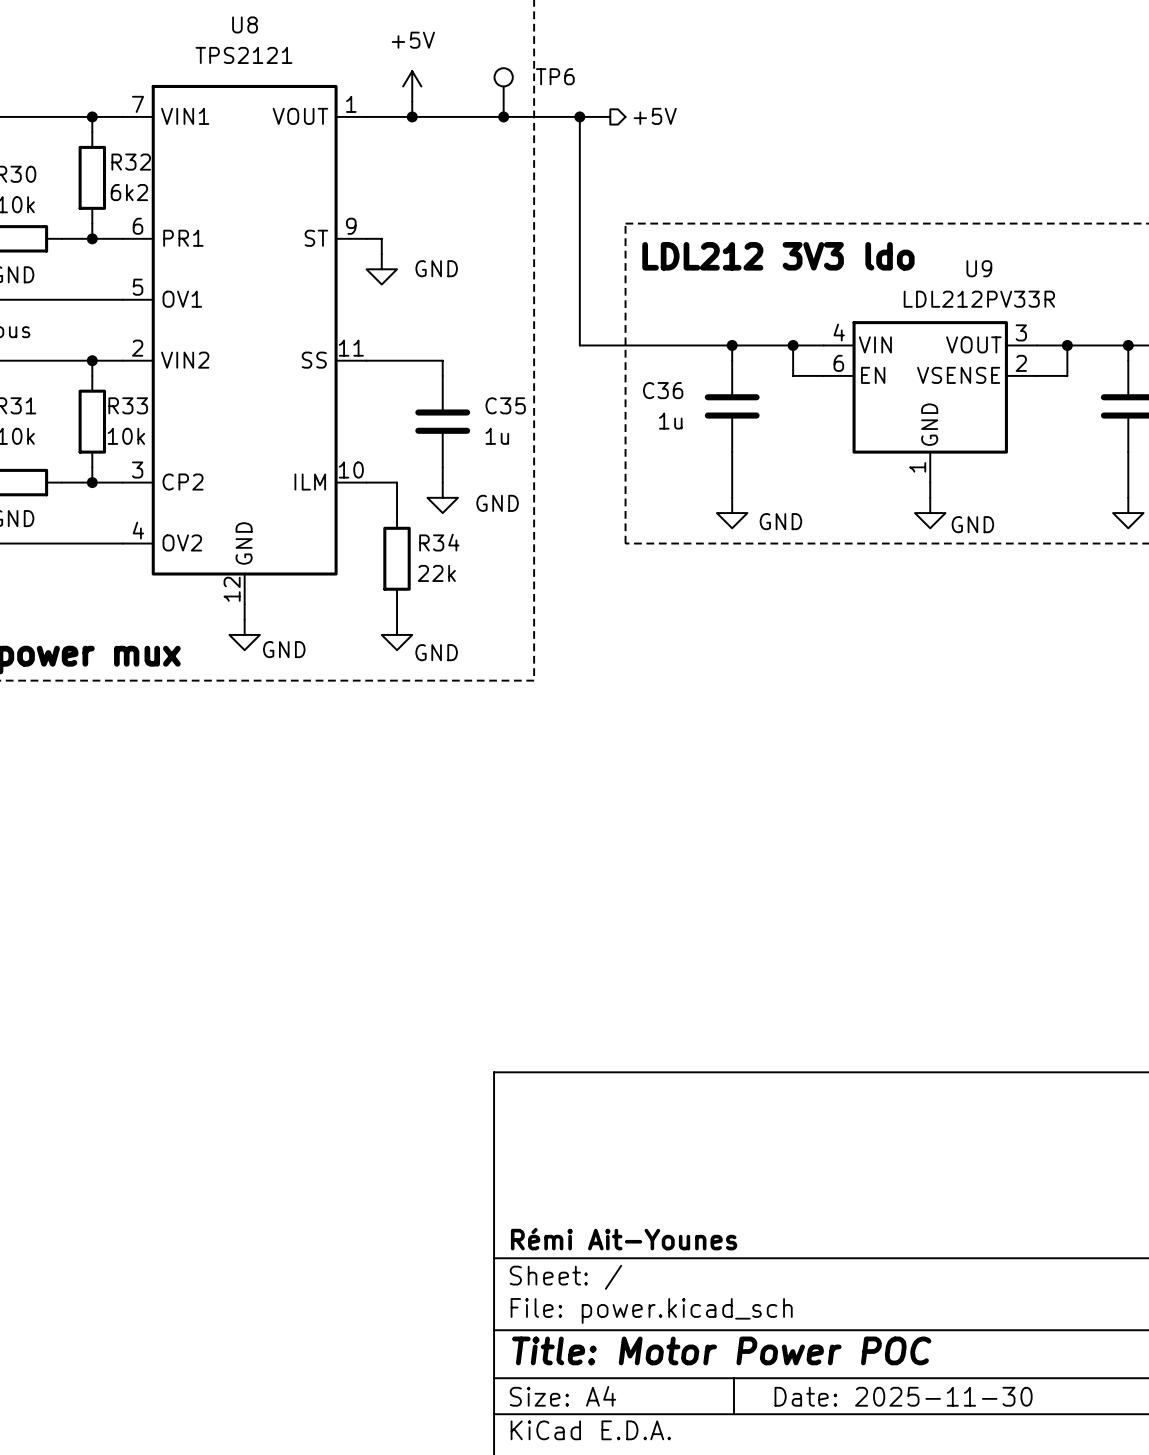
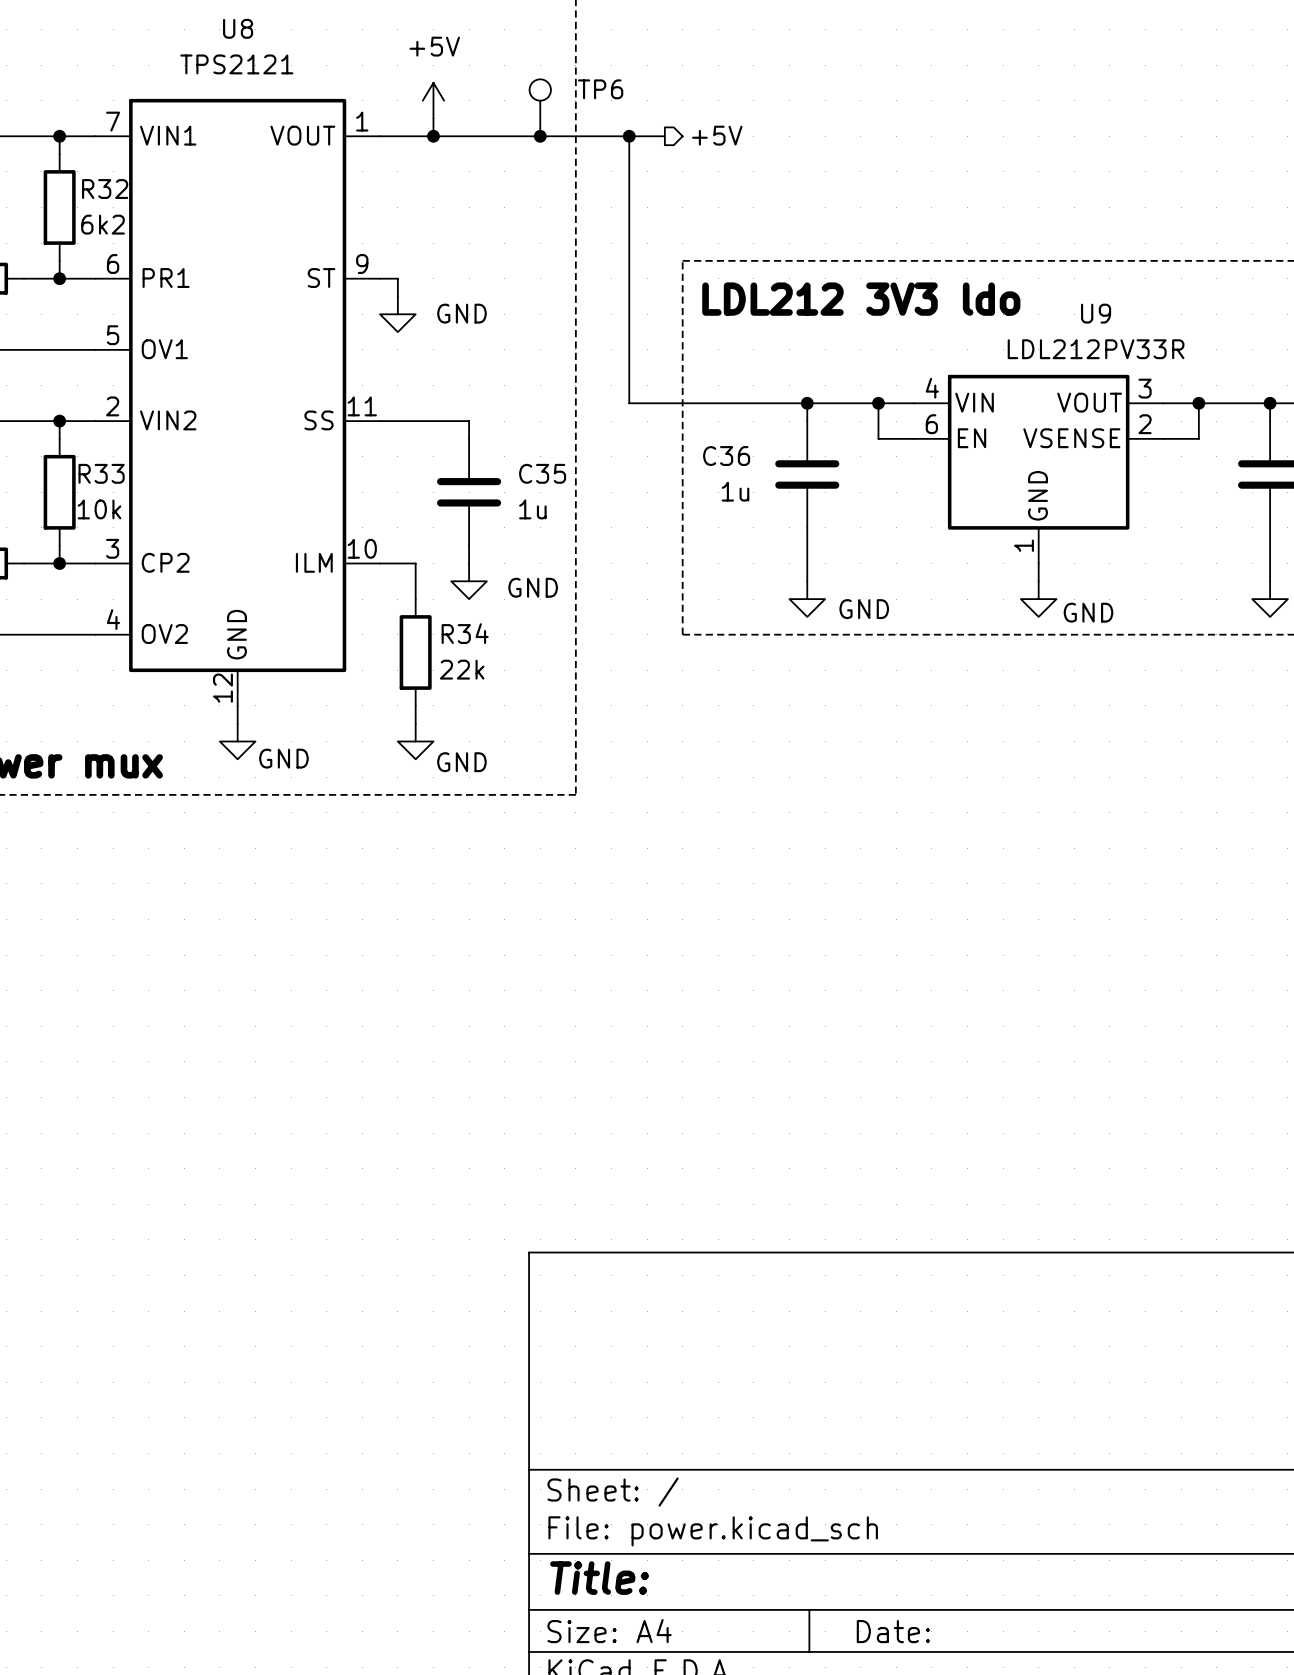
title block: Rémi Ait-Younes (624, 1239) -> none
title block: Title: Motor Power POC (721, 1350) -> Title: (599, 1578)
title block: Date: 2025-11-30 (903, 1396) -> Date: (893, 1631)

